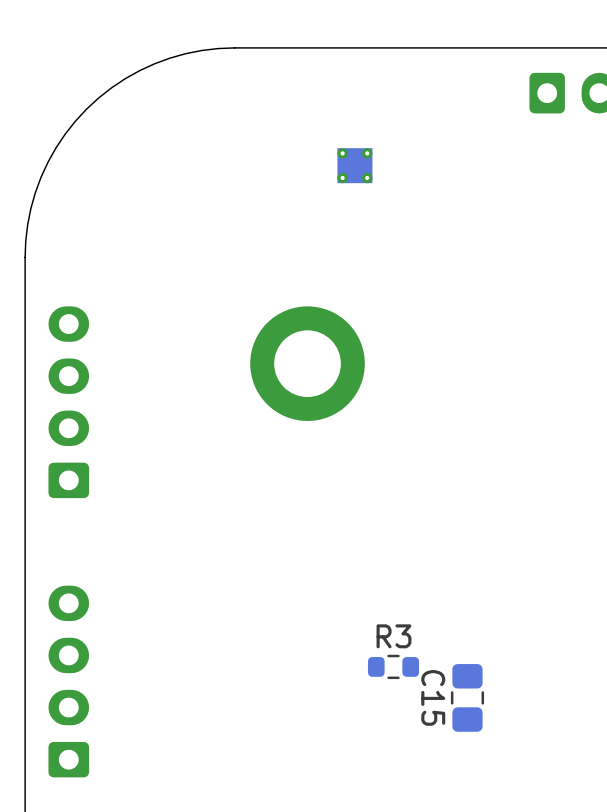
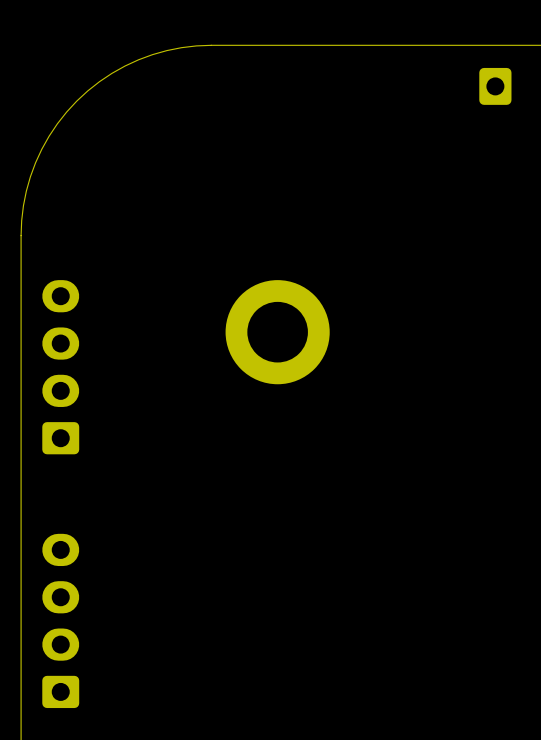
part: (354, 165) -> none
R3: (393, 666) -> none
C15: (467, 697) -> none

